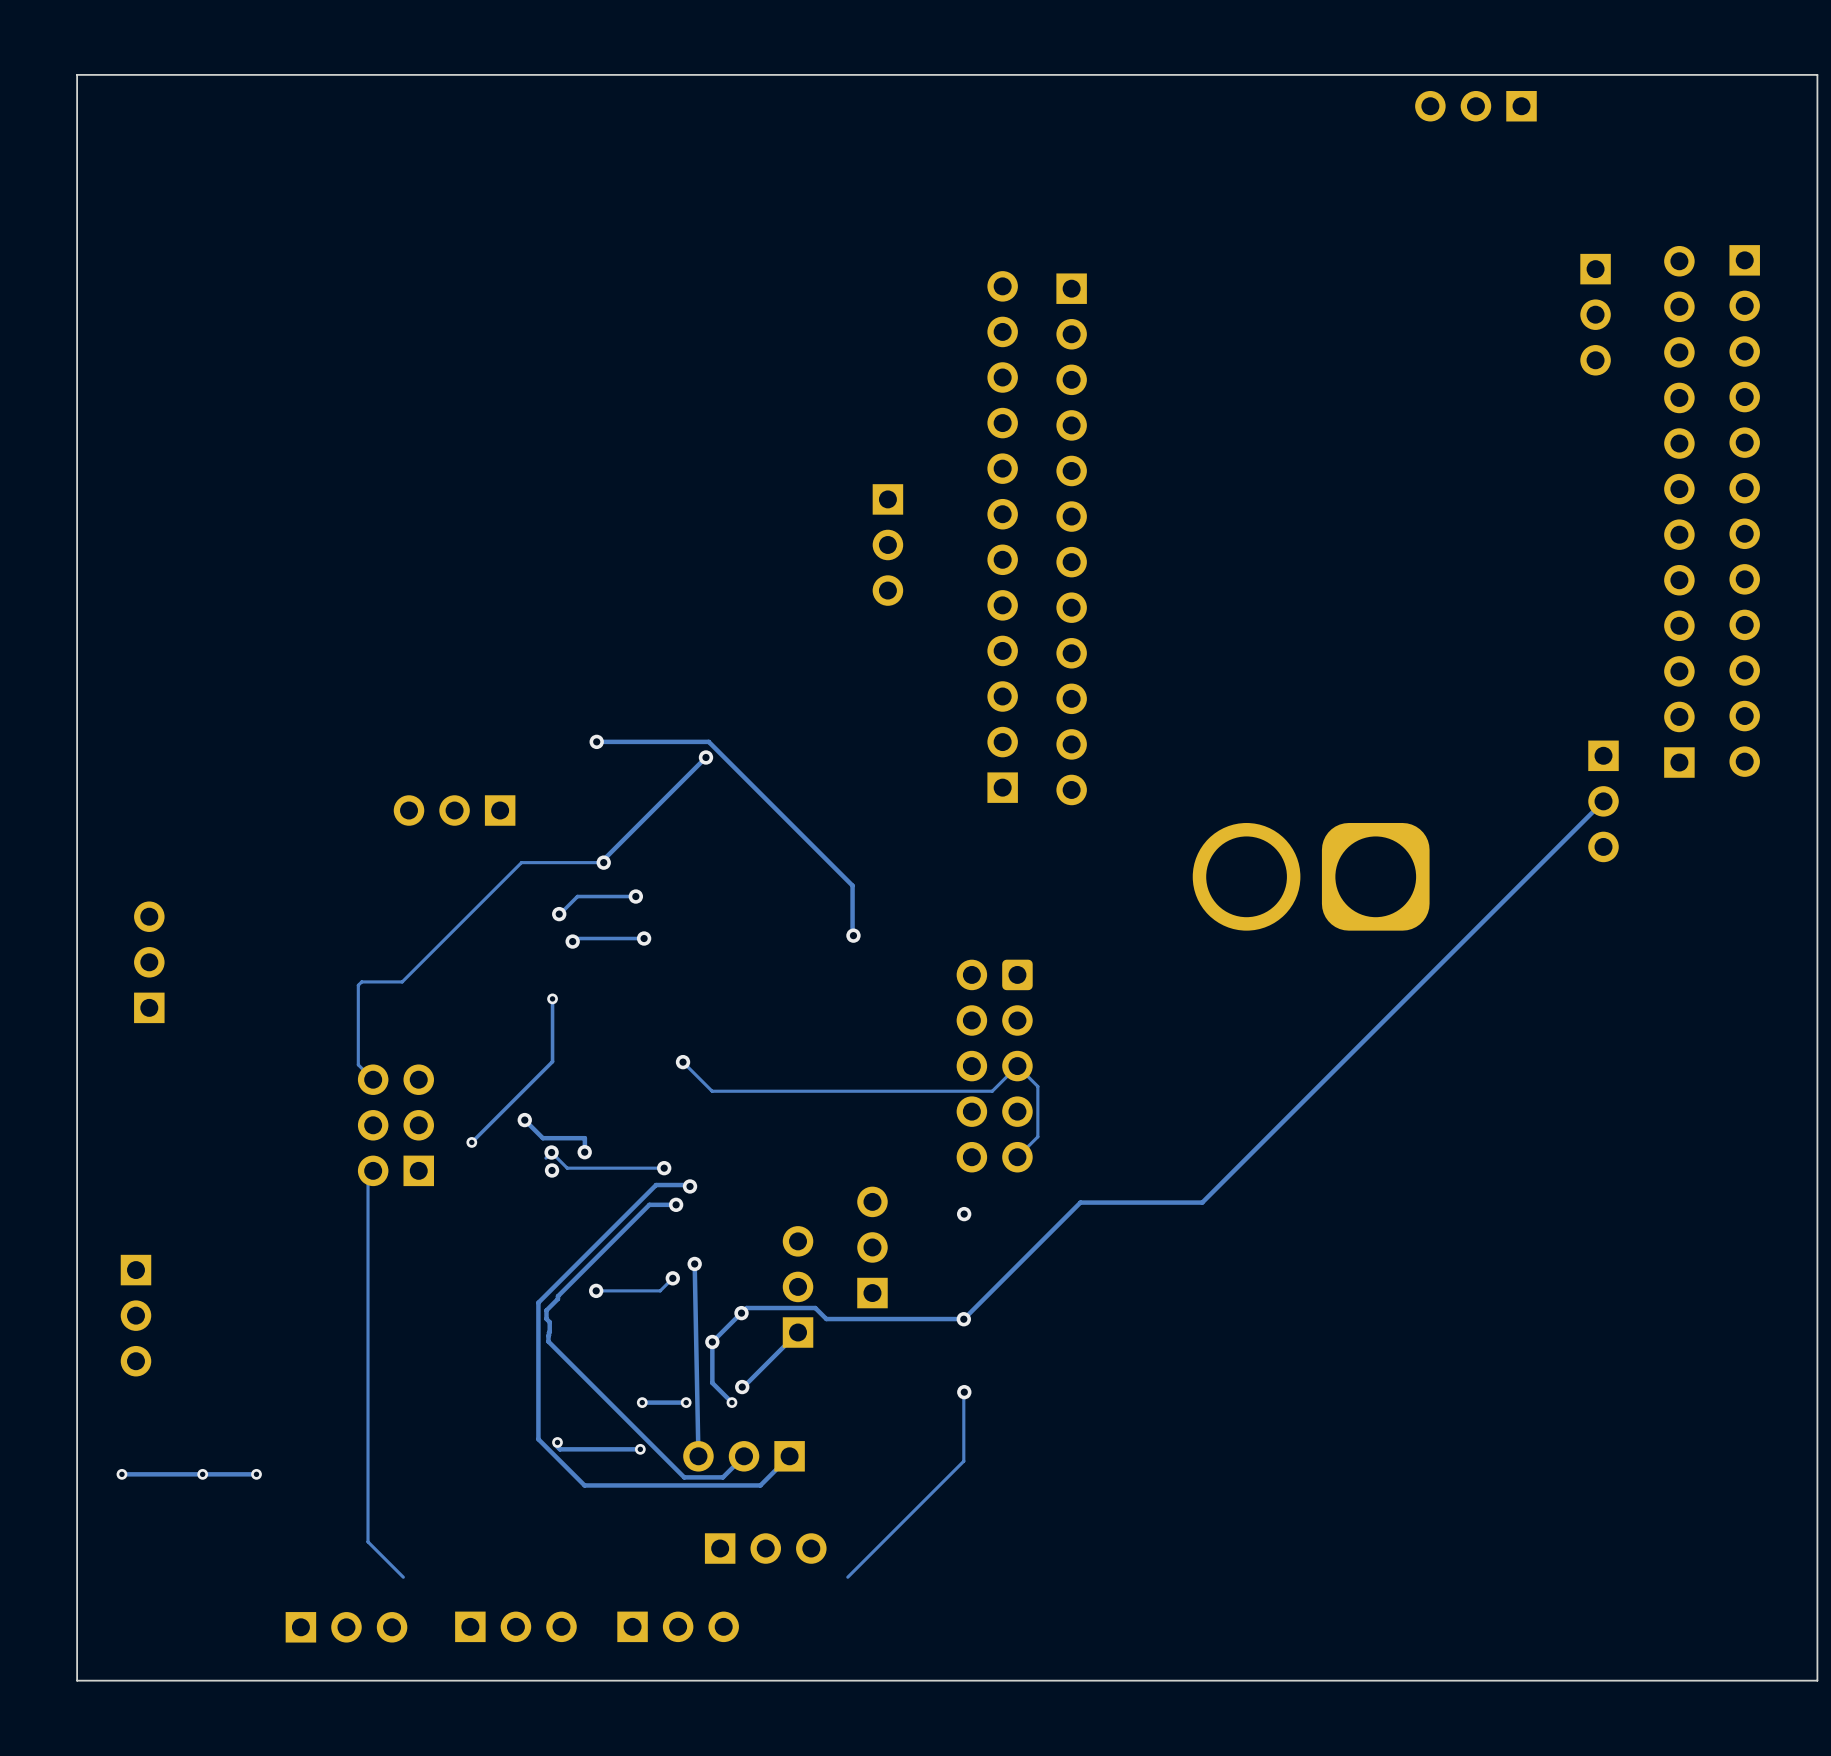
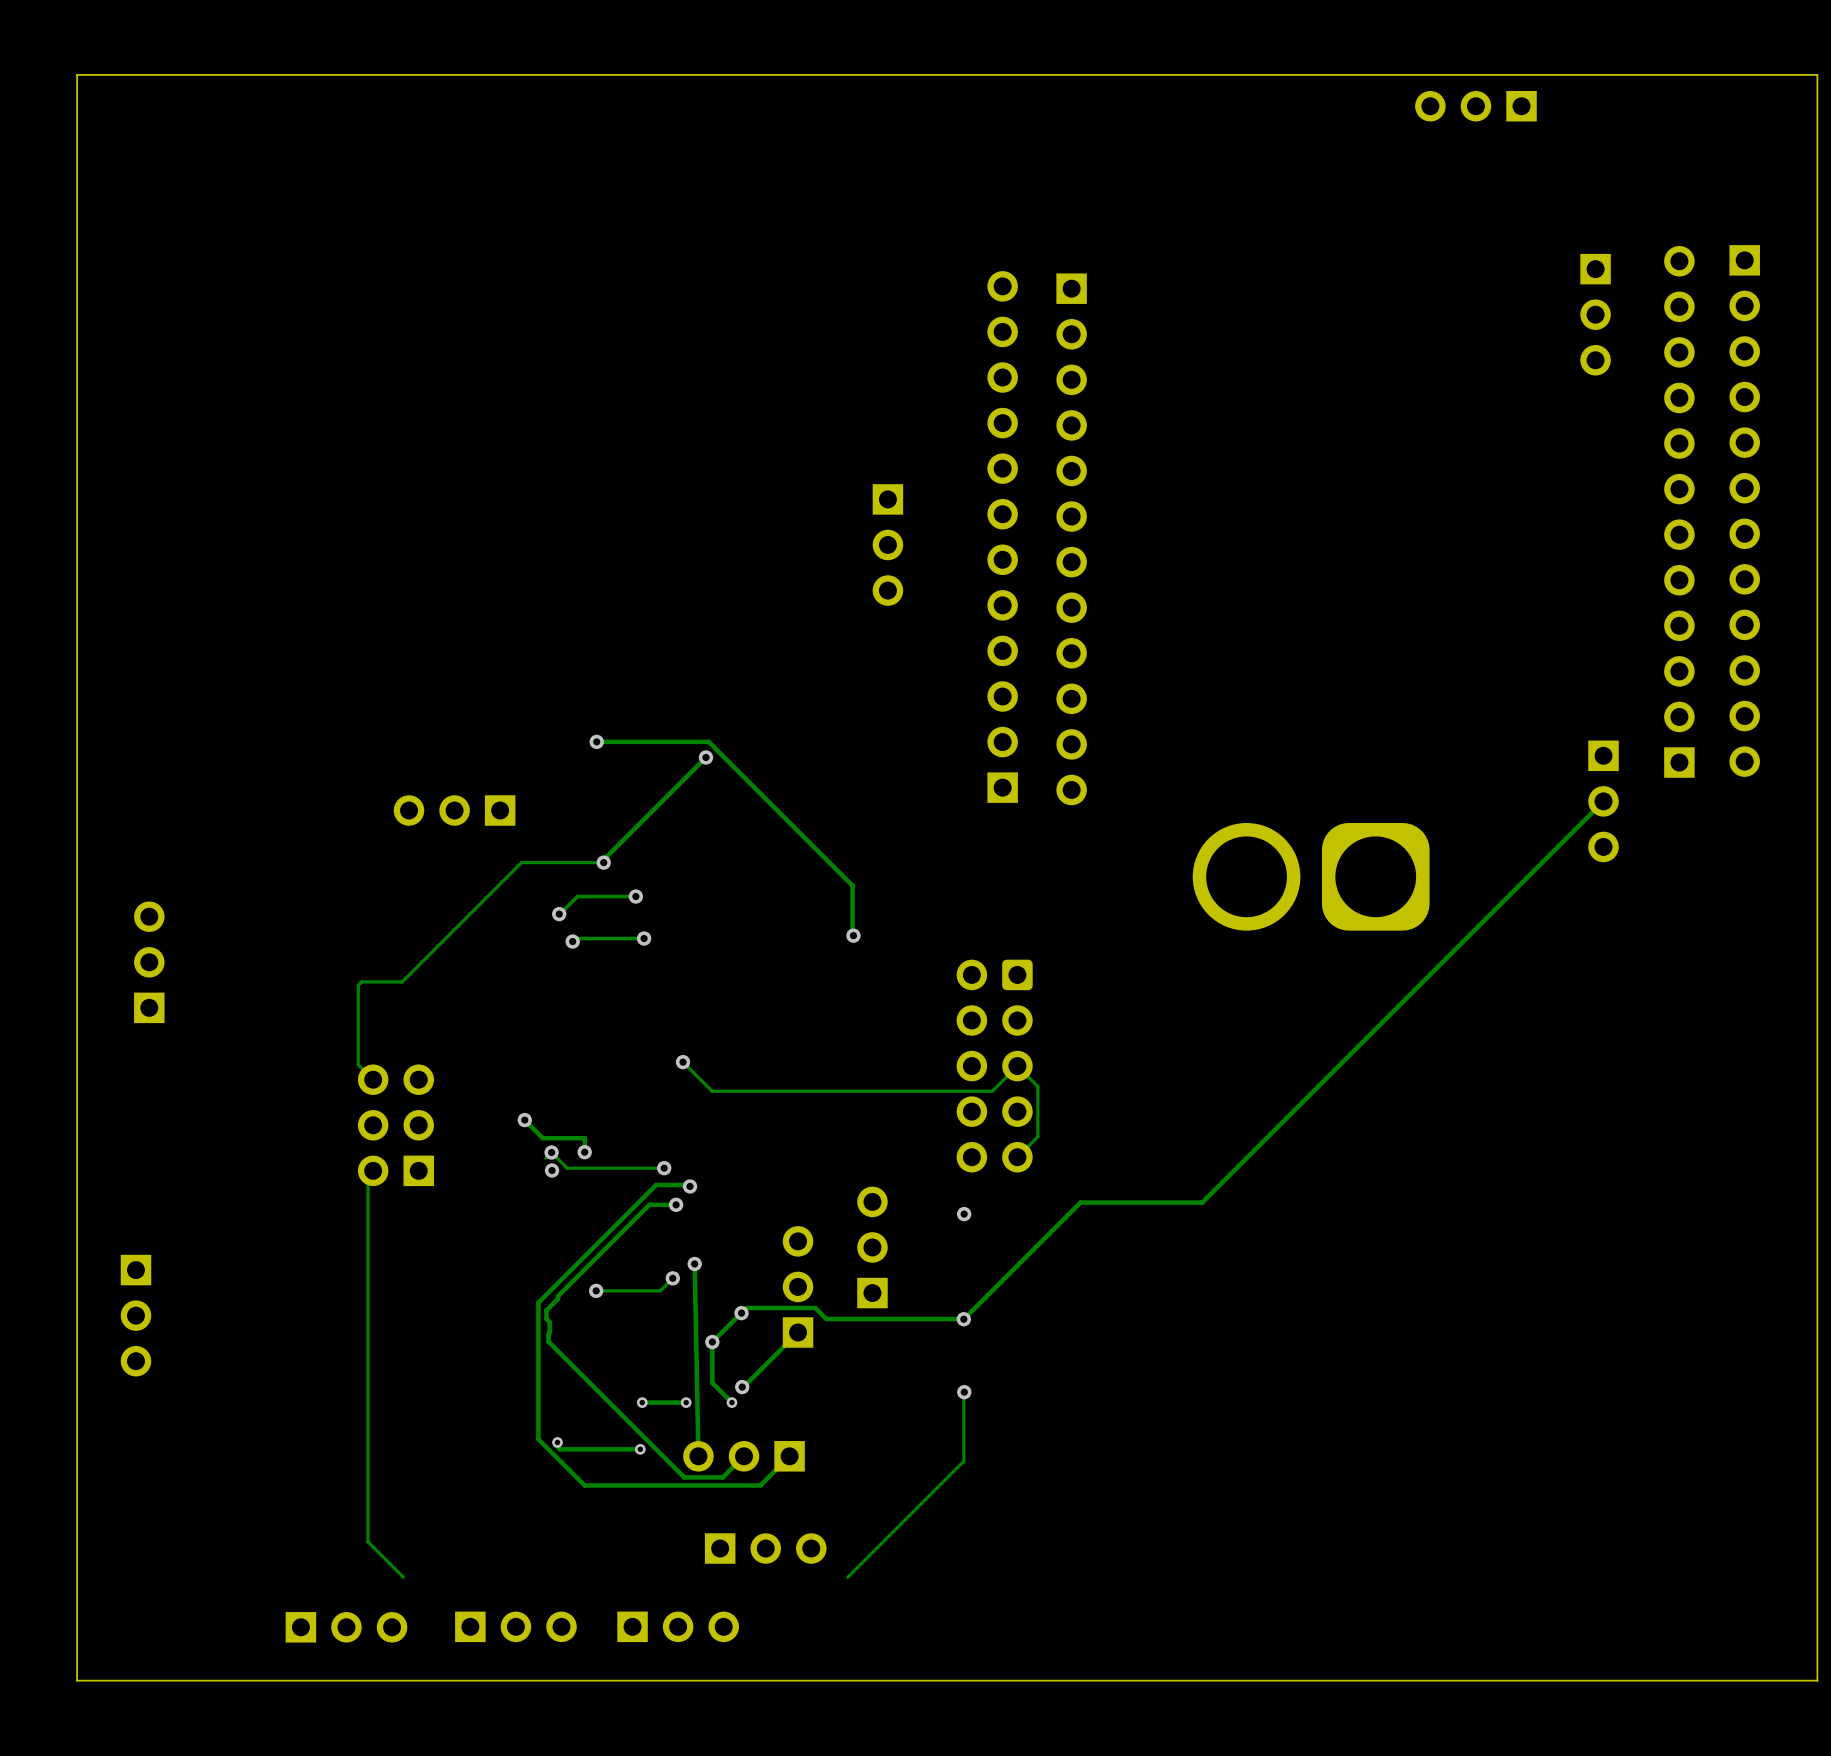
track: (552, 998) (552, 1061) (471, 1142) -> none
via: (552, 998) -> none
via: (471, 1142) -> none
via: (121, 1474) -> none
via: (202, 1474) -> none
track: (256, 1474) (121, 1474) -> none
via: (256, 1474) -> none

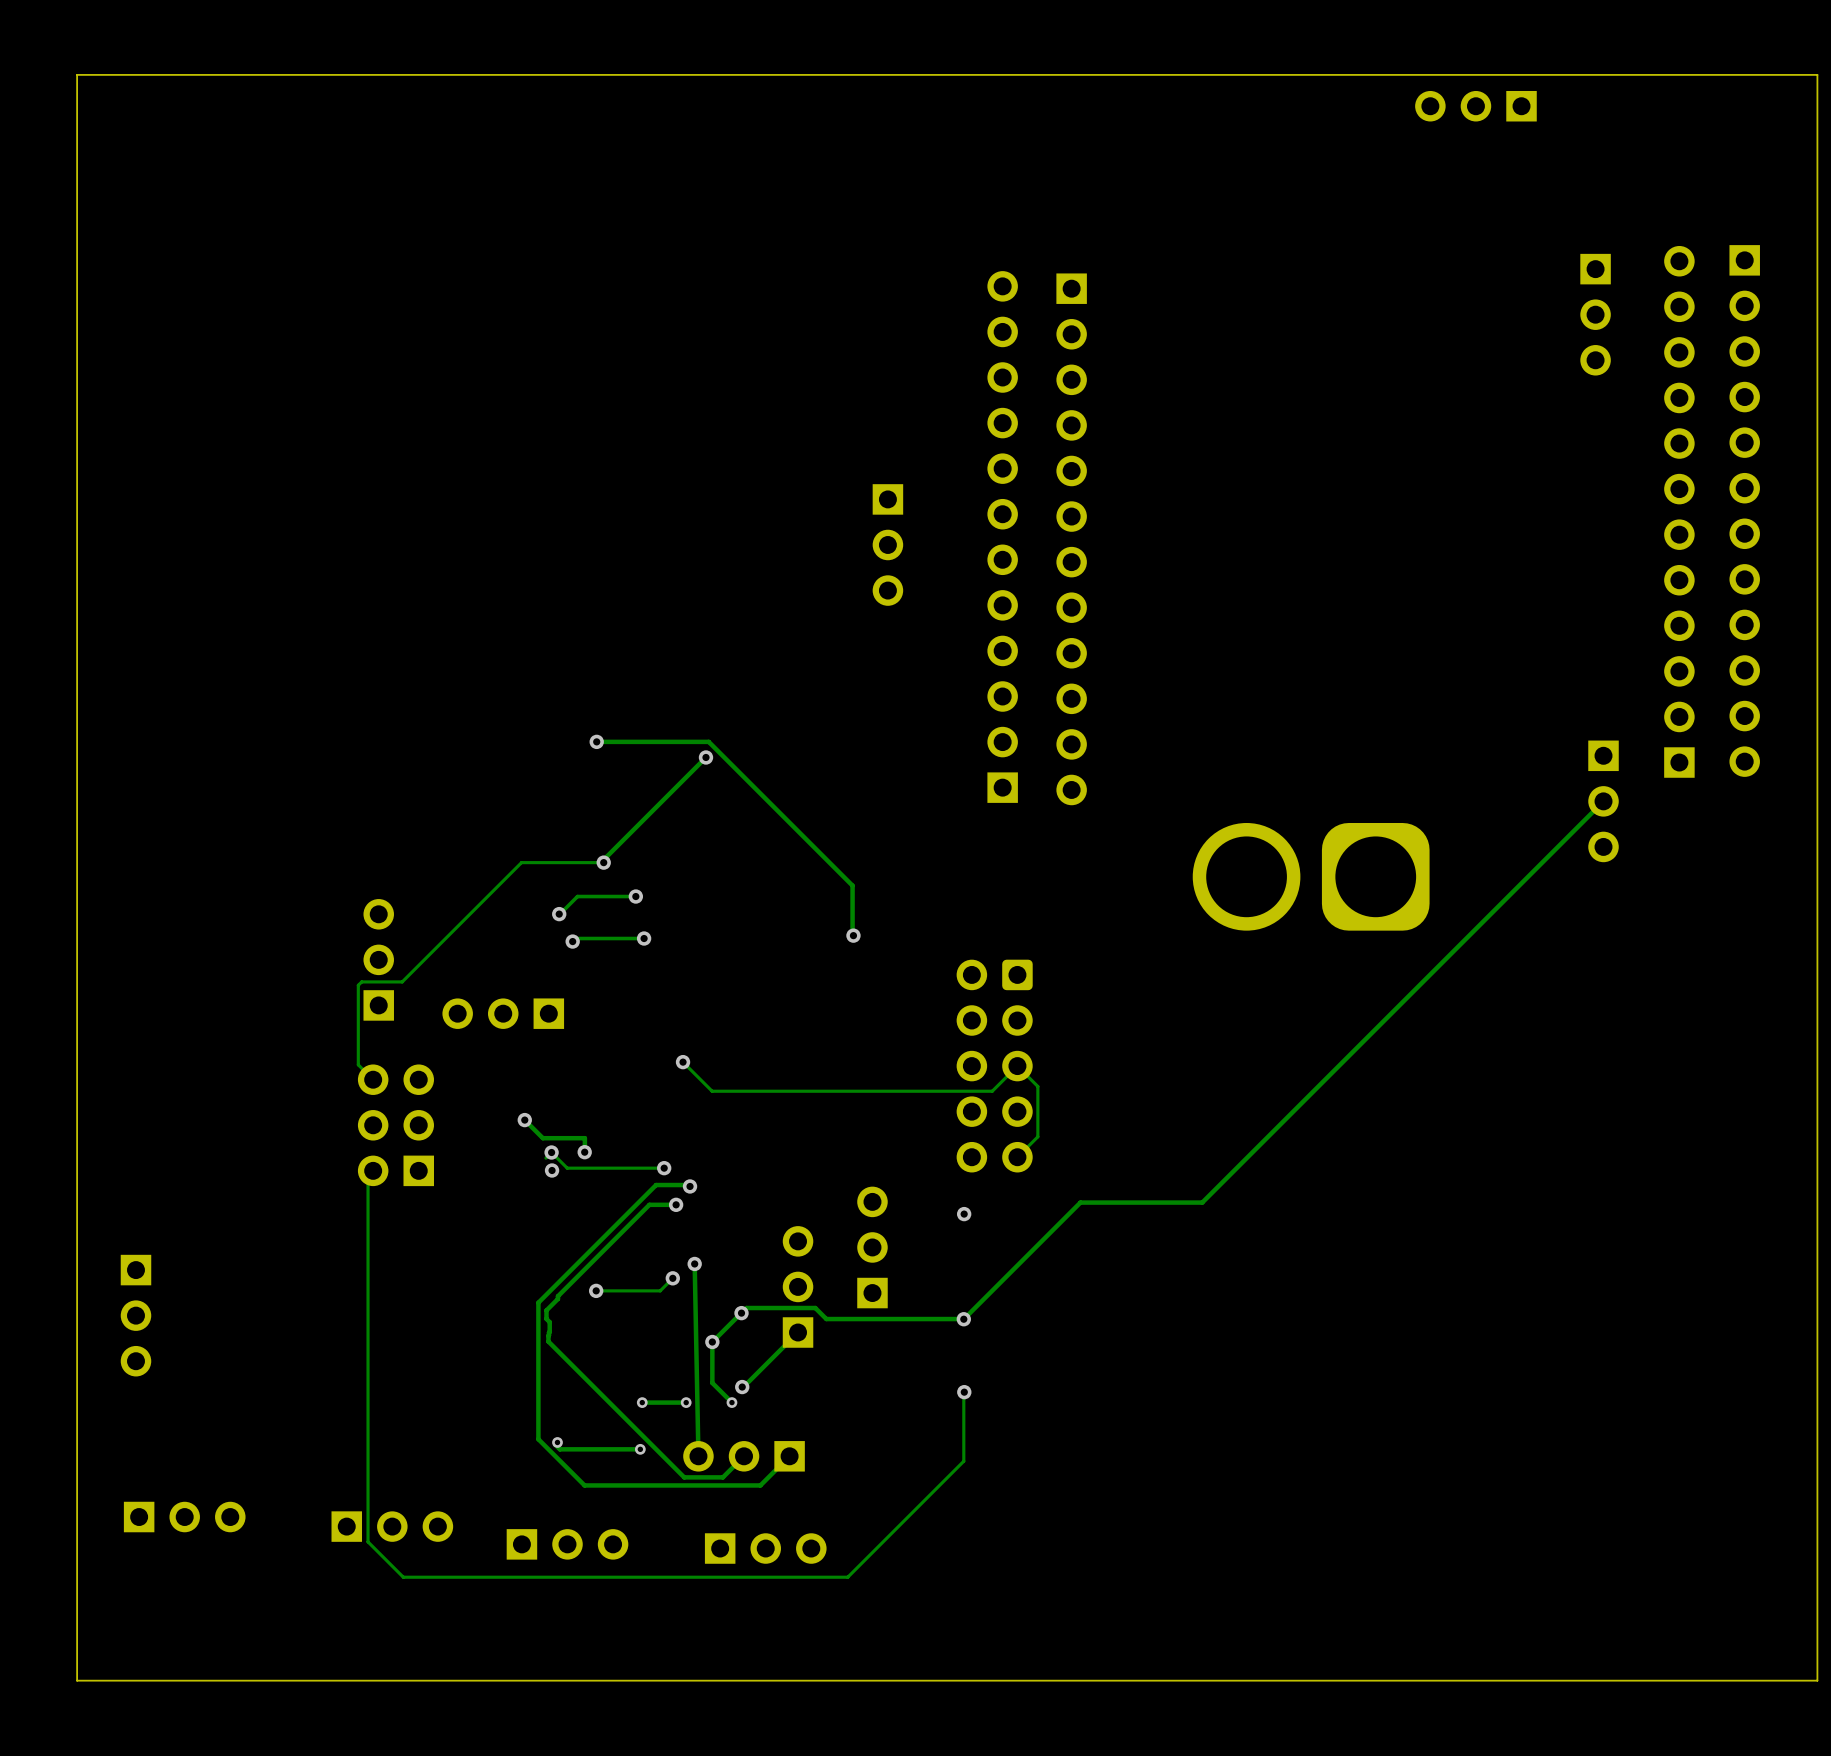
part: (454, 810) -> none
part: none -> (378, 959)
part: (149, 962) -> none
part: none -> (503, 1013)
part: none -> (184, 1517)
part: none -> (392, 1526)
part: none -> (567, 1544)
track: none -> (847, 1577) (403, 1577)
part: (515, 1626) -> none
part: (678, 1626) -> none
part: (346, 1627) -> none

